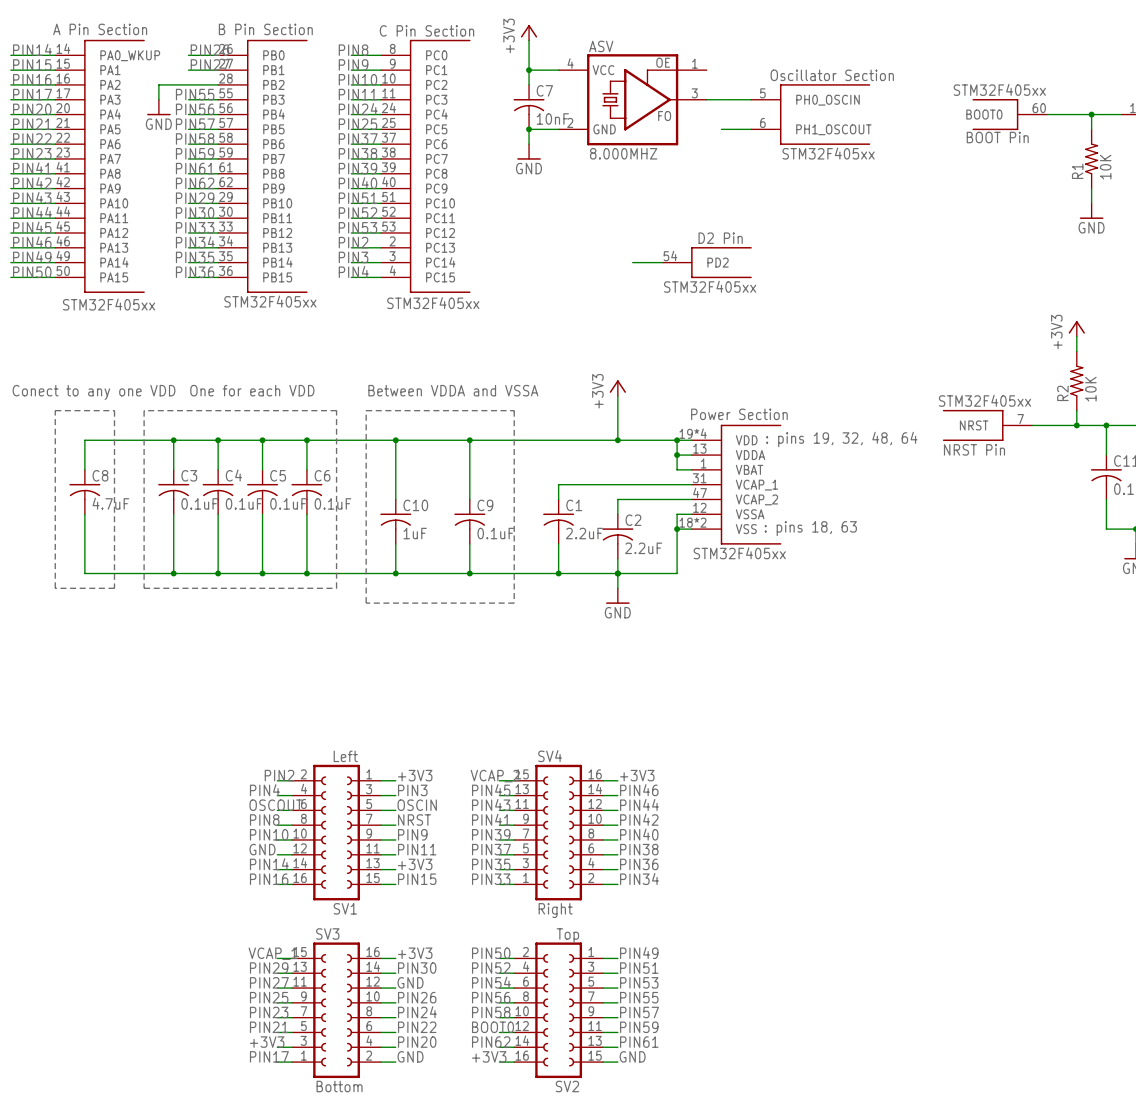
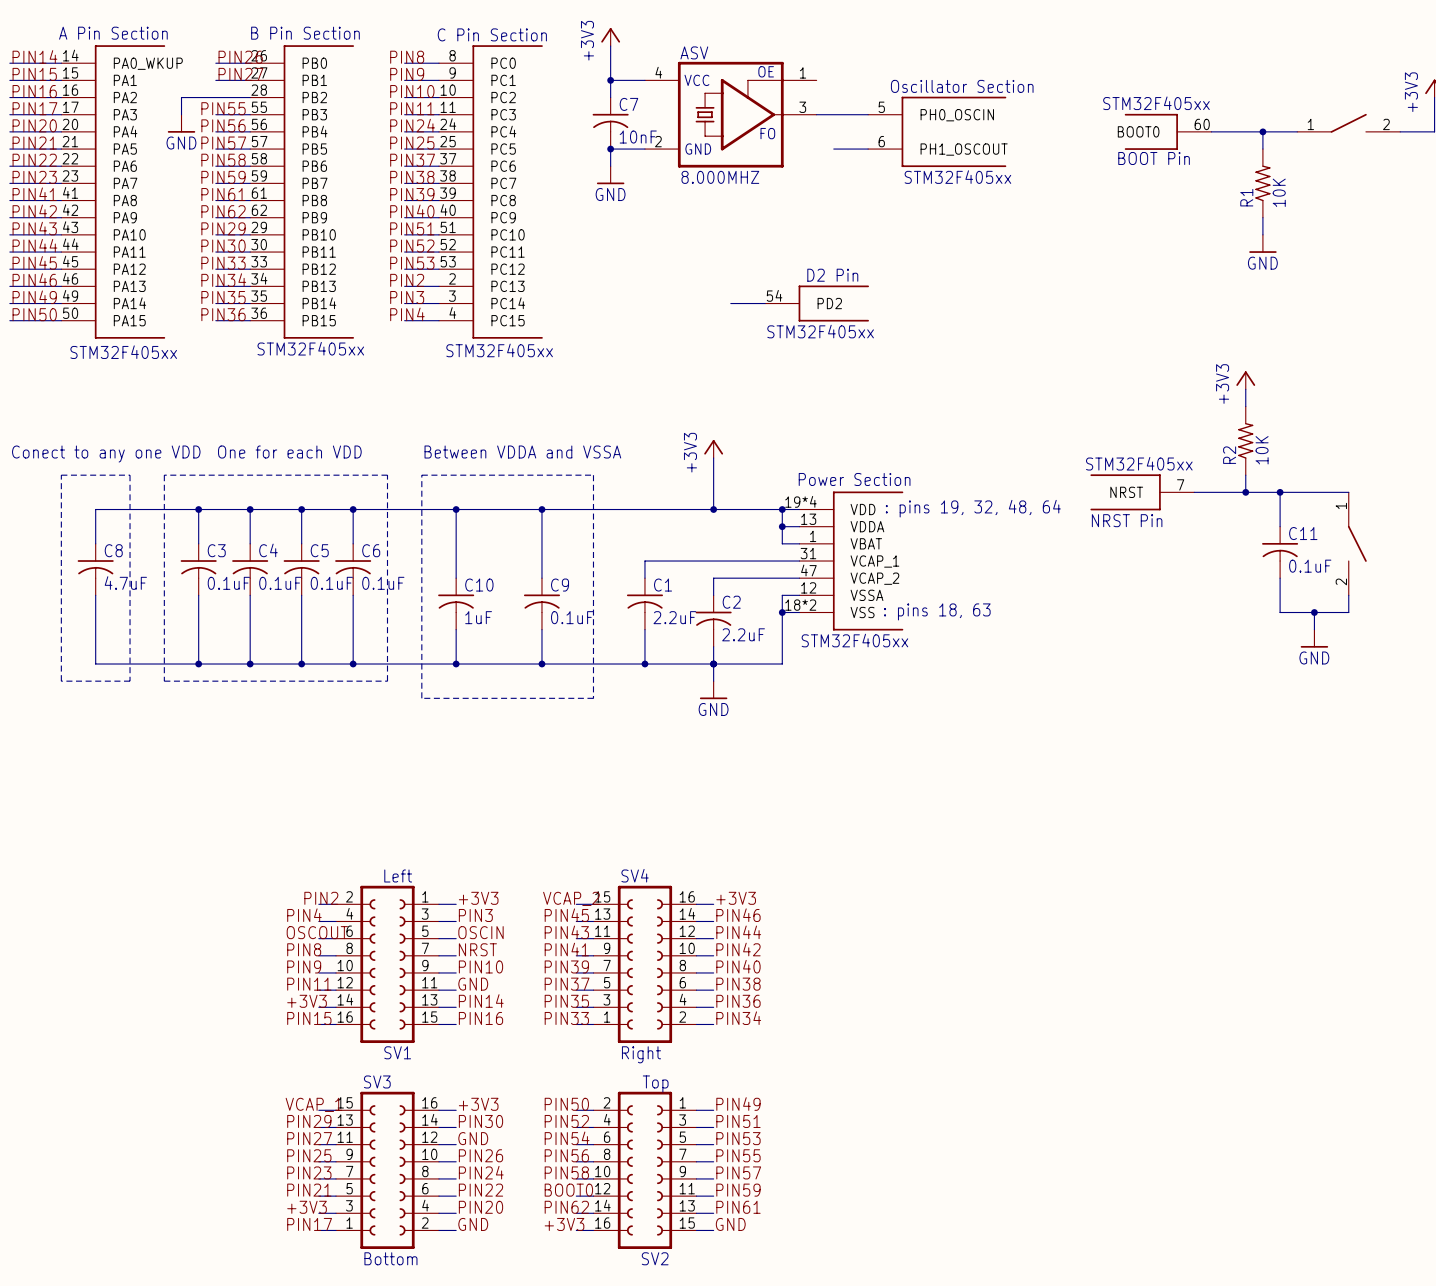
label: PIN10 (269, 834) -> PIN9 (304, 966)
label: PIN9 (412, 834) -> PIN10 (480, 966)
label: GND (262, 849) -> PIN11 (309, 984)
label: PIN11 (417, 849) -> GND (473, 984)
label: PIN14 (269, 864) -> +3V3 (307, 1001)
label: +3V3 (415, 864) -> PIN14 (481, 1001)
label: PIN16 (269, 879) -> PIN15 (309, 1018)
label: PIN15 (417, 879) -> PIN16 (480, 1018)

